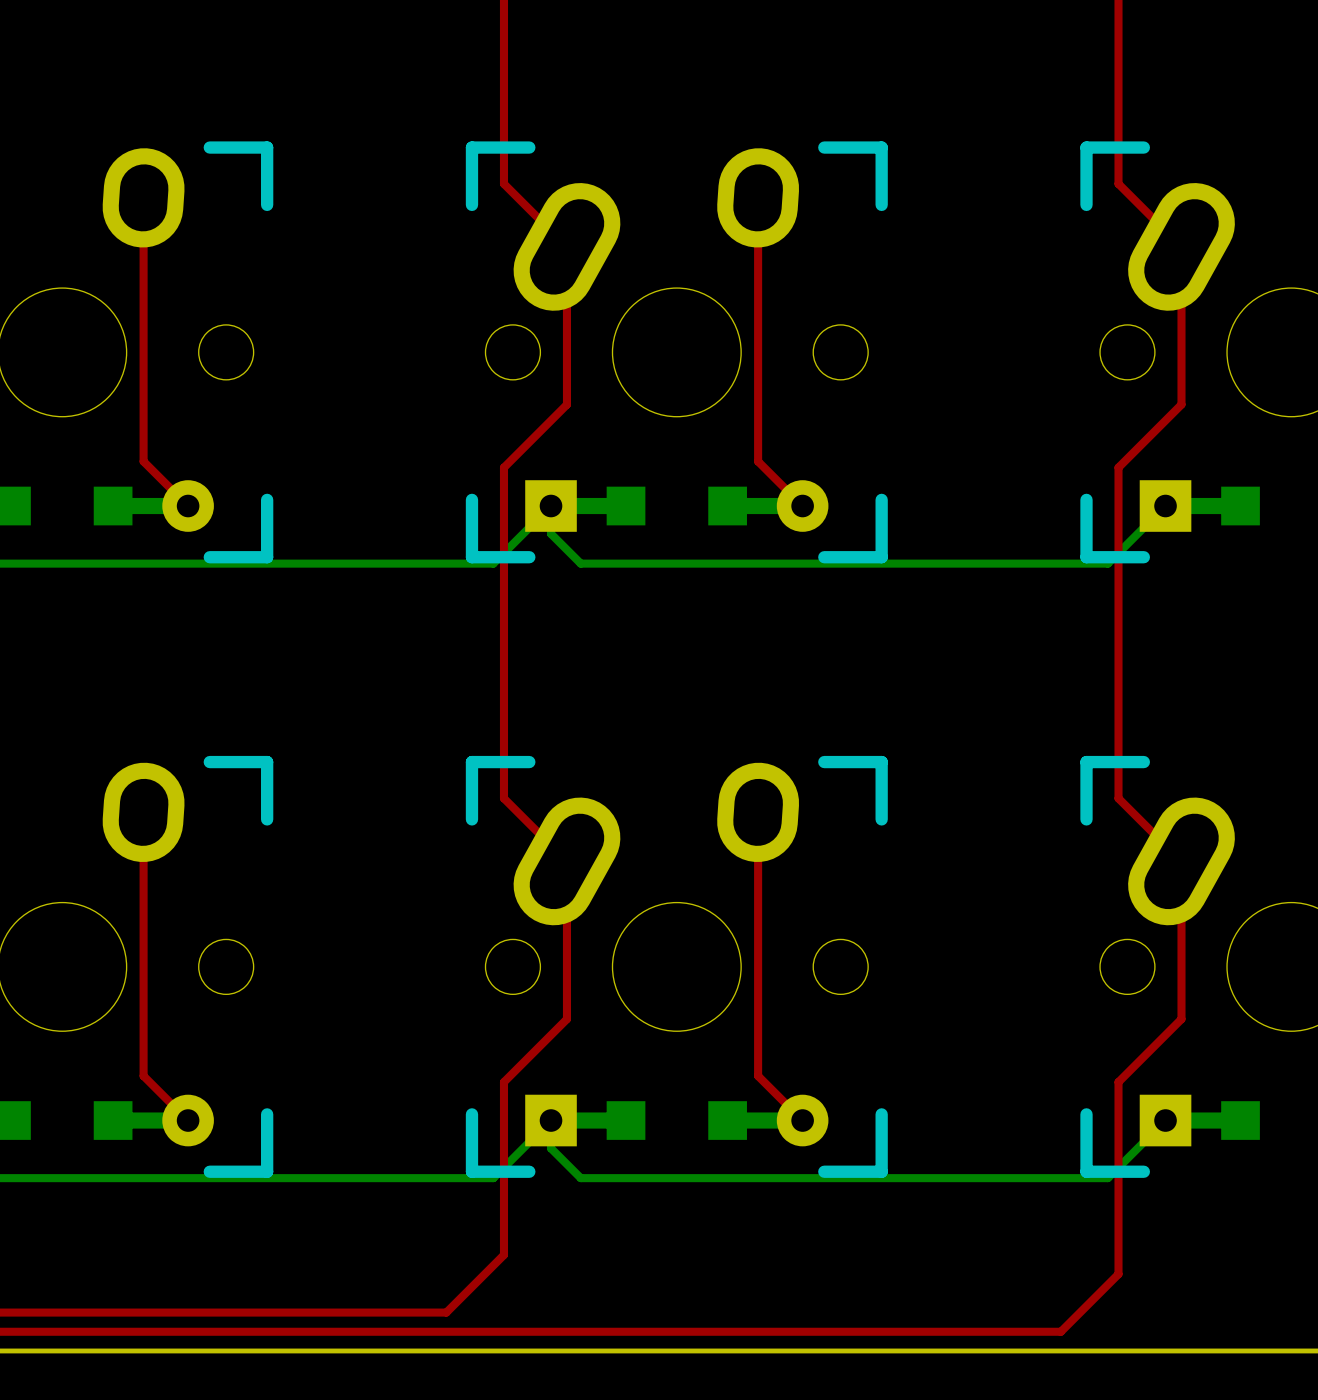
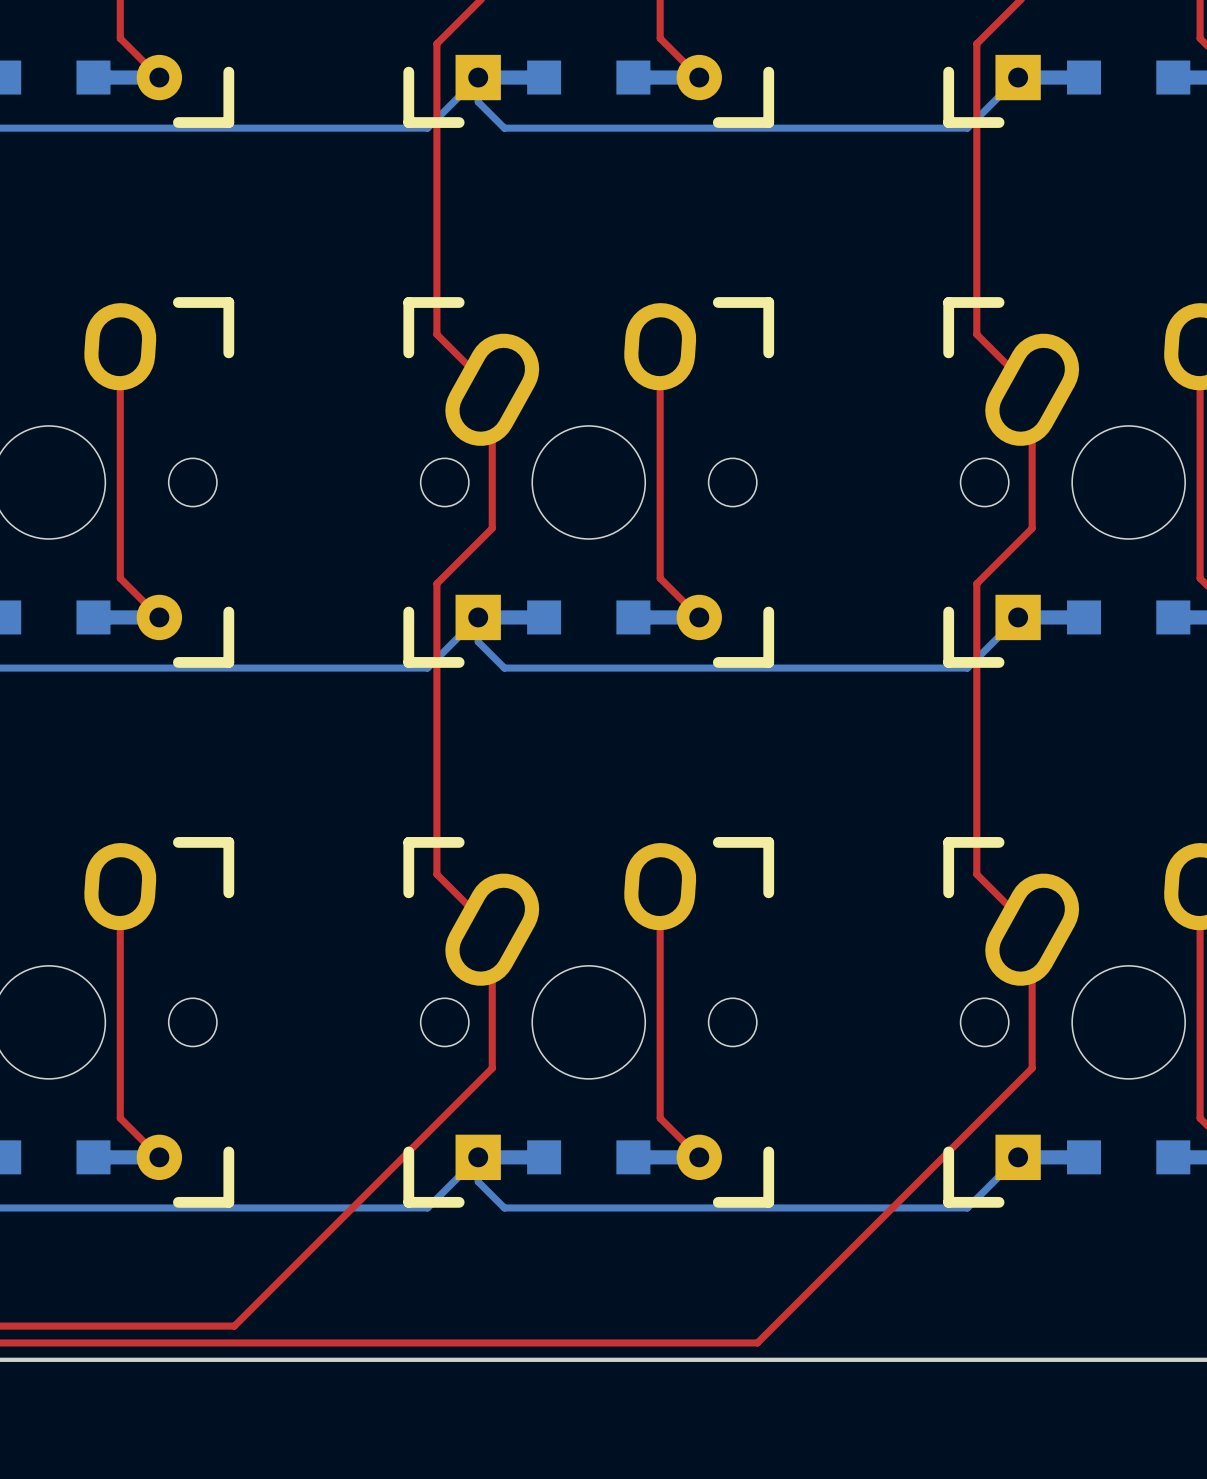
top track: (503, 1082) (503, 1254) (446, 1312) (273, 1312) -> (436, 1123) (234, 1326)
top track: (1118, 1082) (1118, 1274) (1060, 1331) (868, 1331) -> (976, 1123) (757, 1342)

